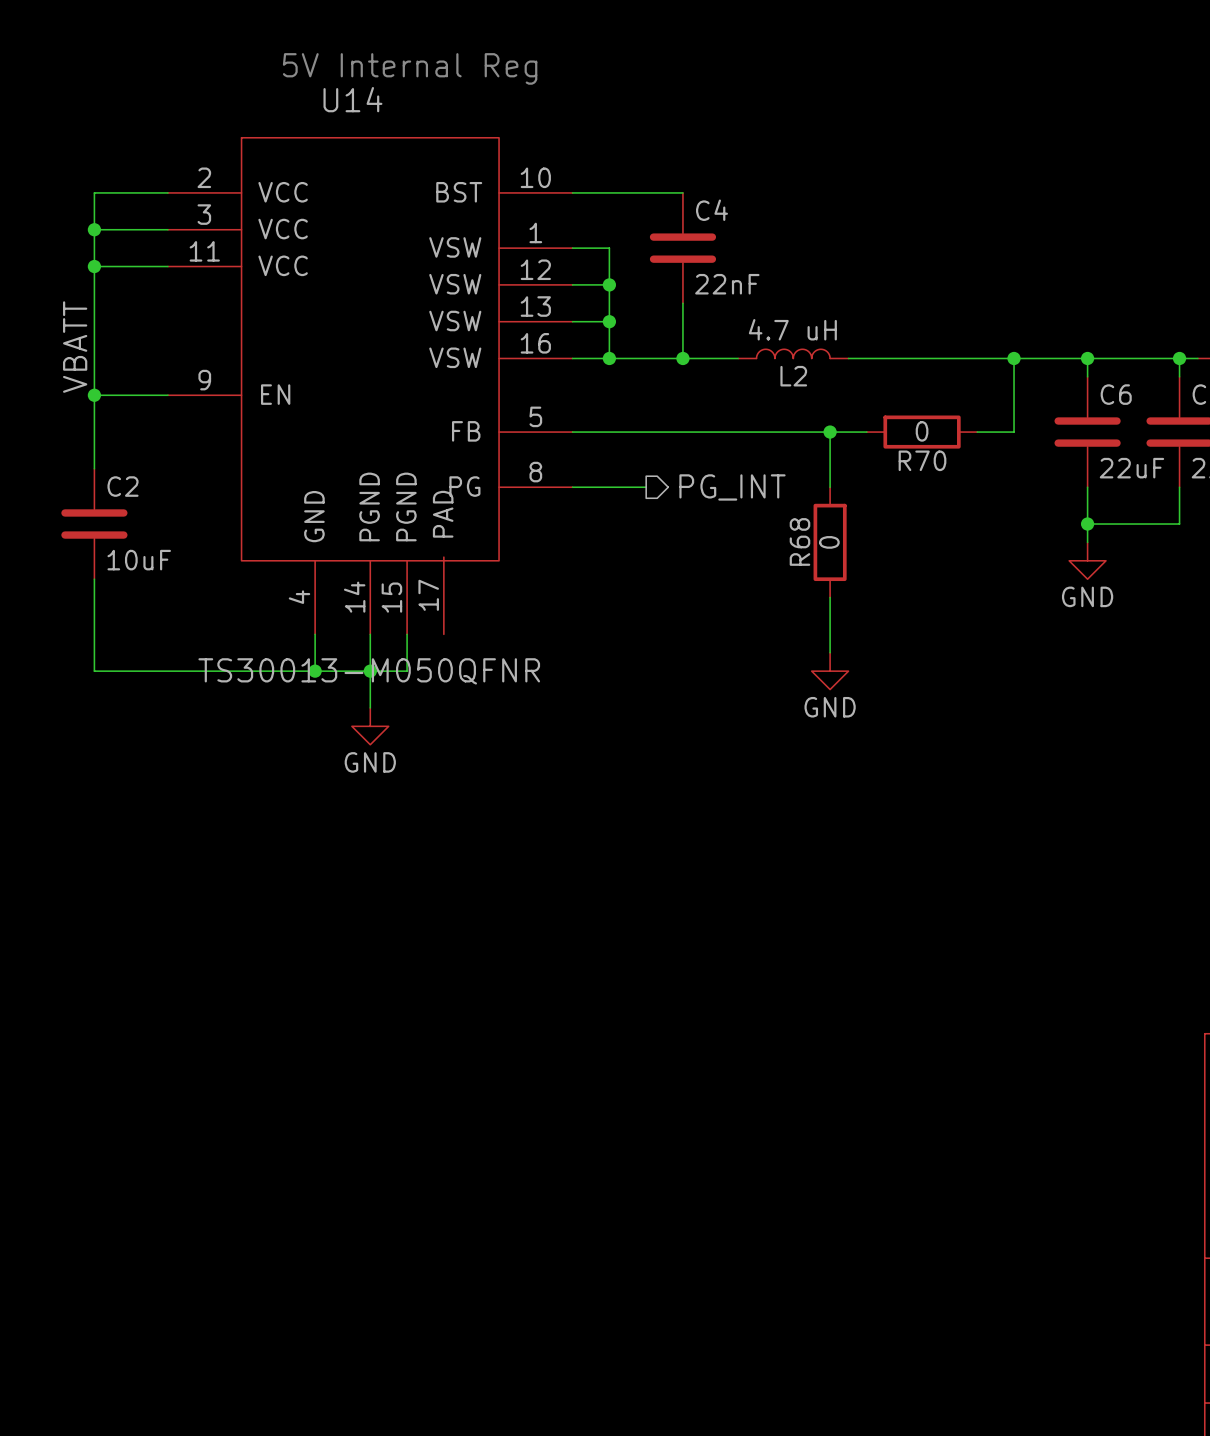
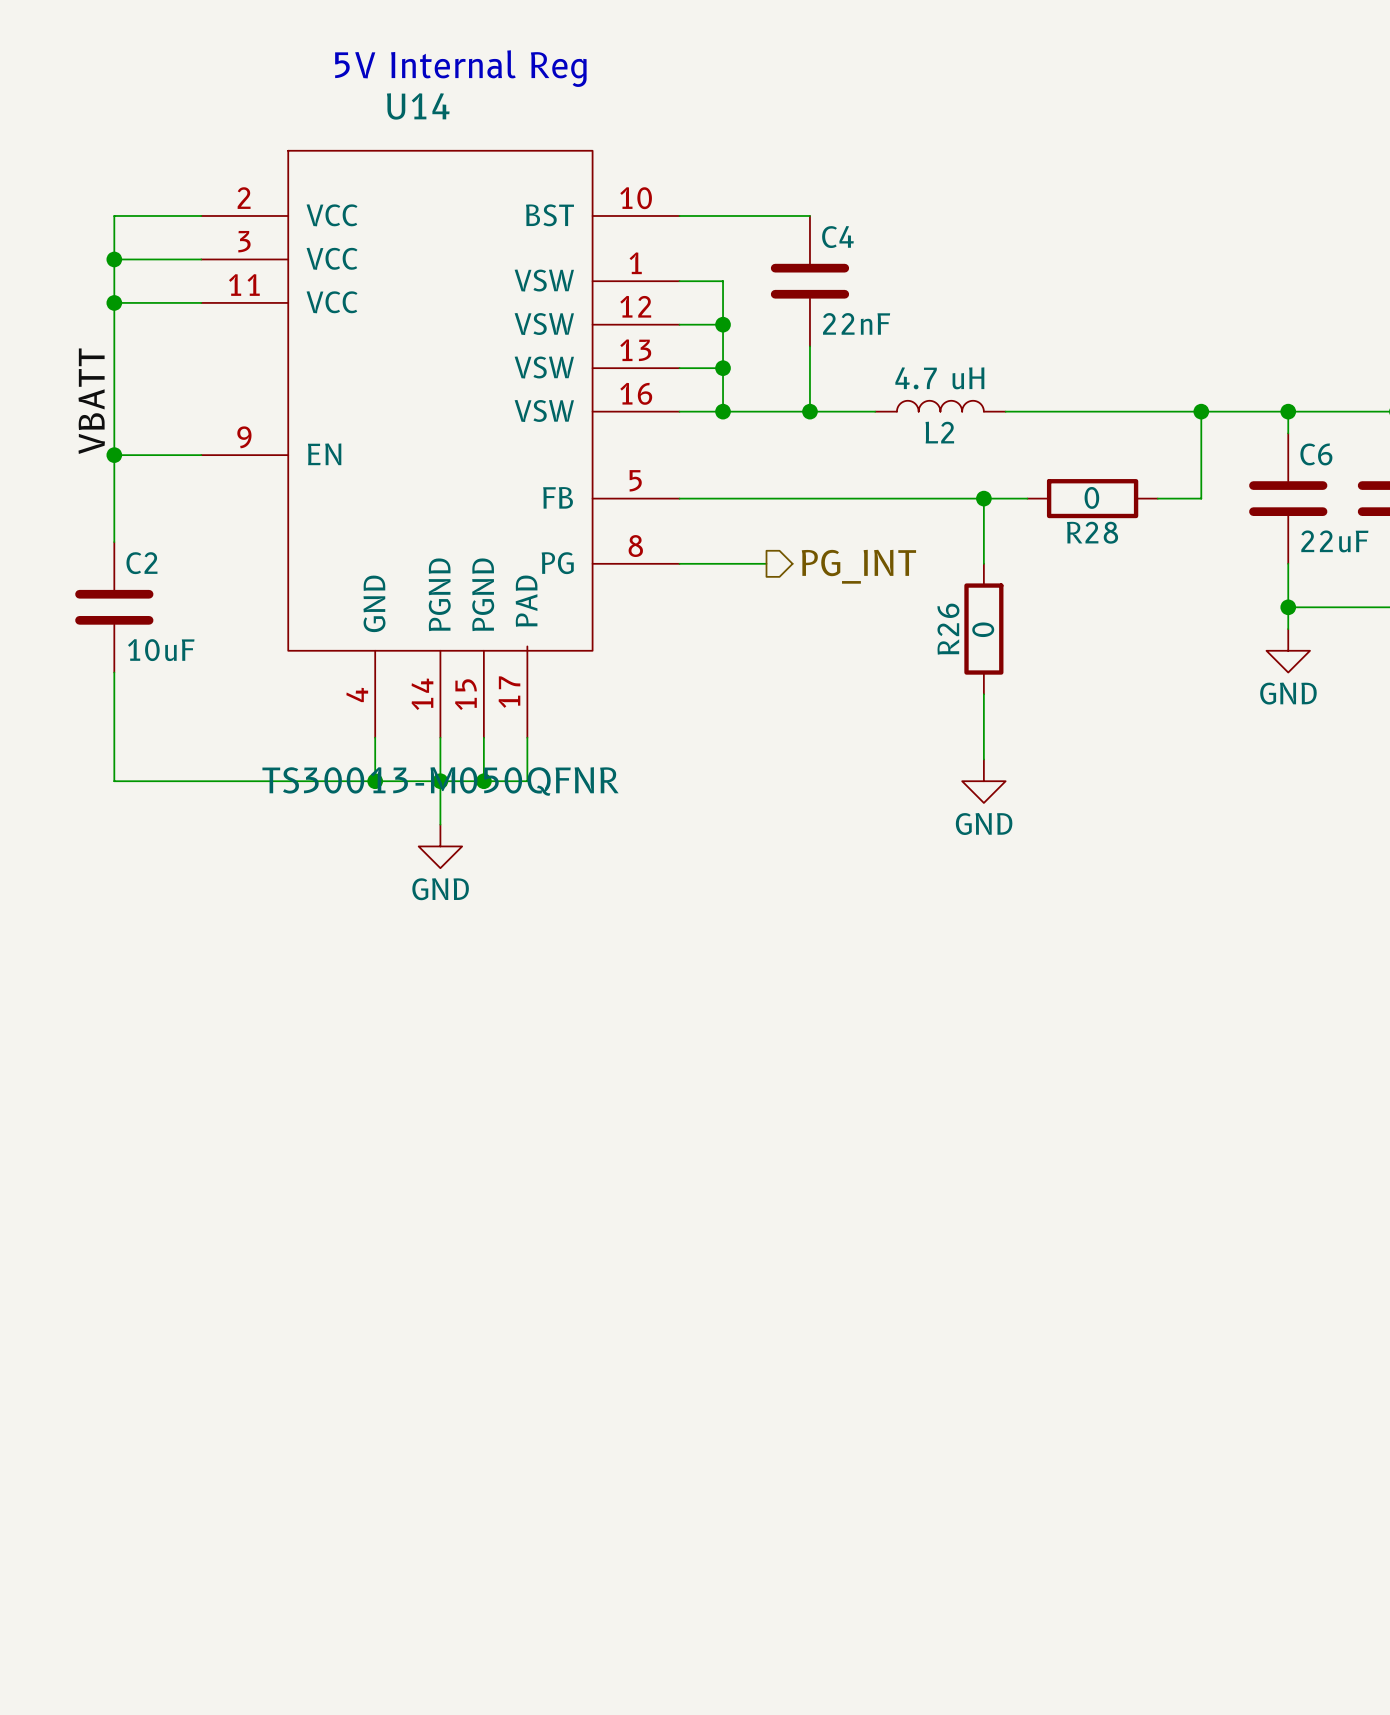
R70 name: R70 (922, 460) -> R28 (1092, 532)
R68 name: R68 (799, 541) -> R26 (948, 629)
wire: none -> (527, 737) (527, 781) (483, 781)
junction: none -> (483, 781)

